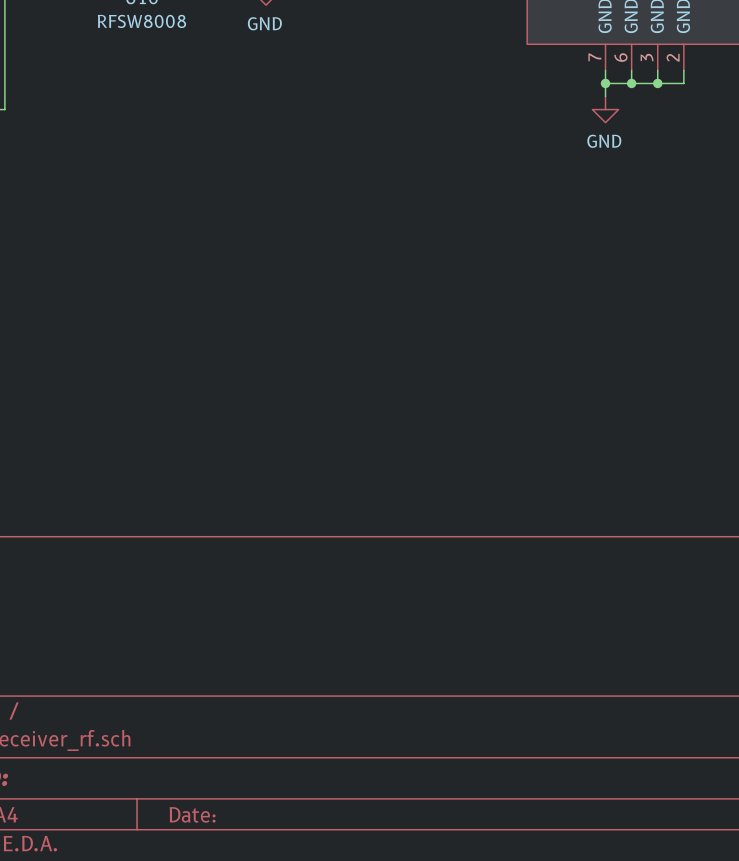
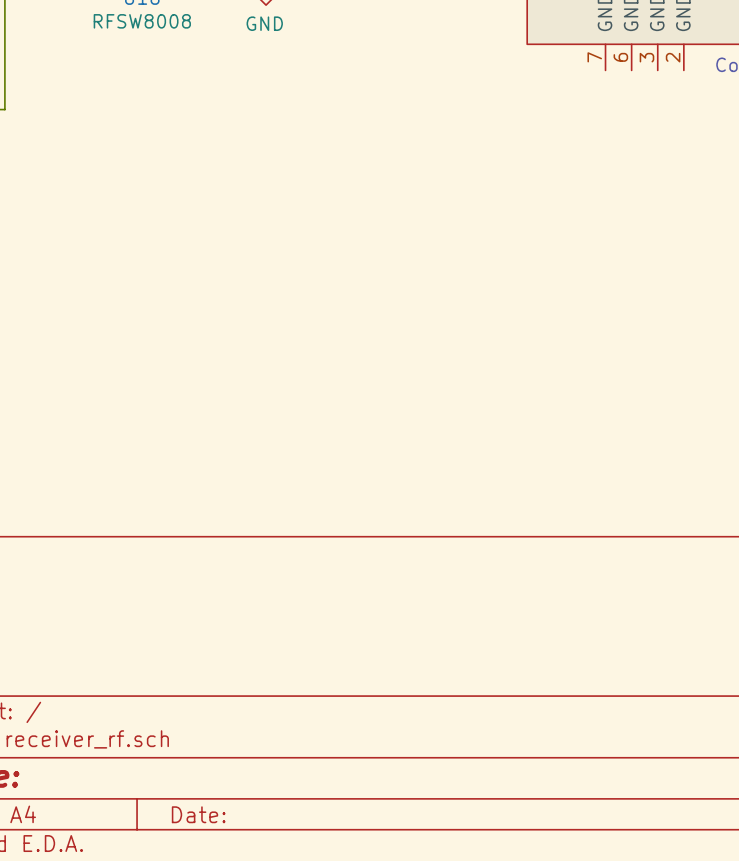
wire: (605, 70) (605, 96) -> none
wire: (631, 70) (631, 83) -> none
wire: (657, 70) (657, 83) -> none
wire: (683, 70) (683, 83) (605, 83) -> none
junction: (605, 83) -> none
junction: (631, 83) -> none
junction: (657, 83) -> none
power symbol: GND (605, 109) -> none

